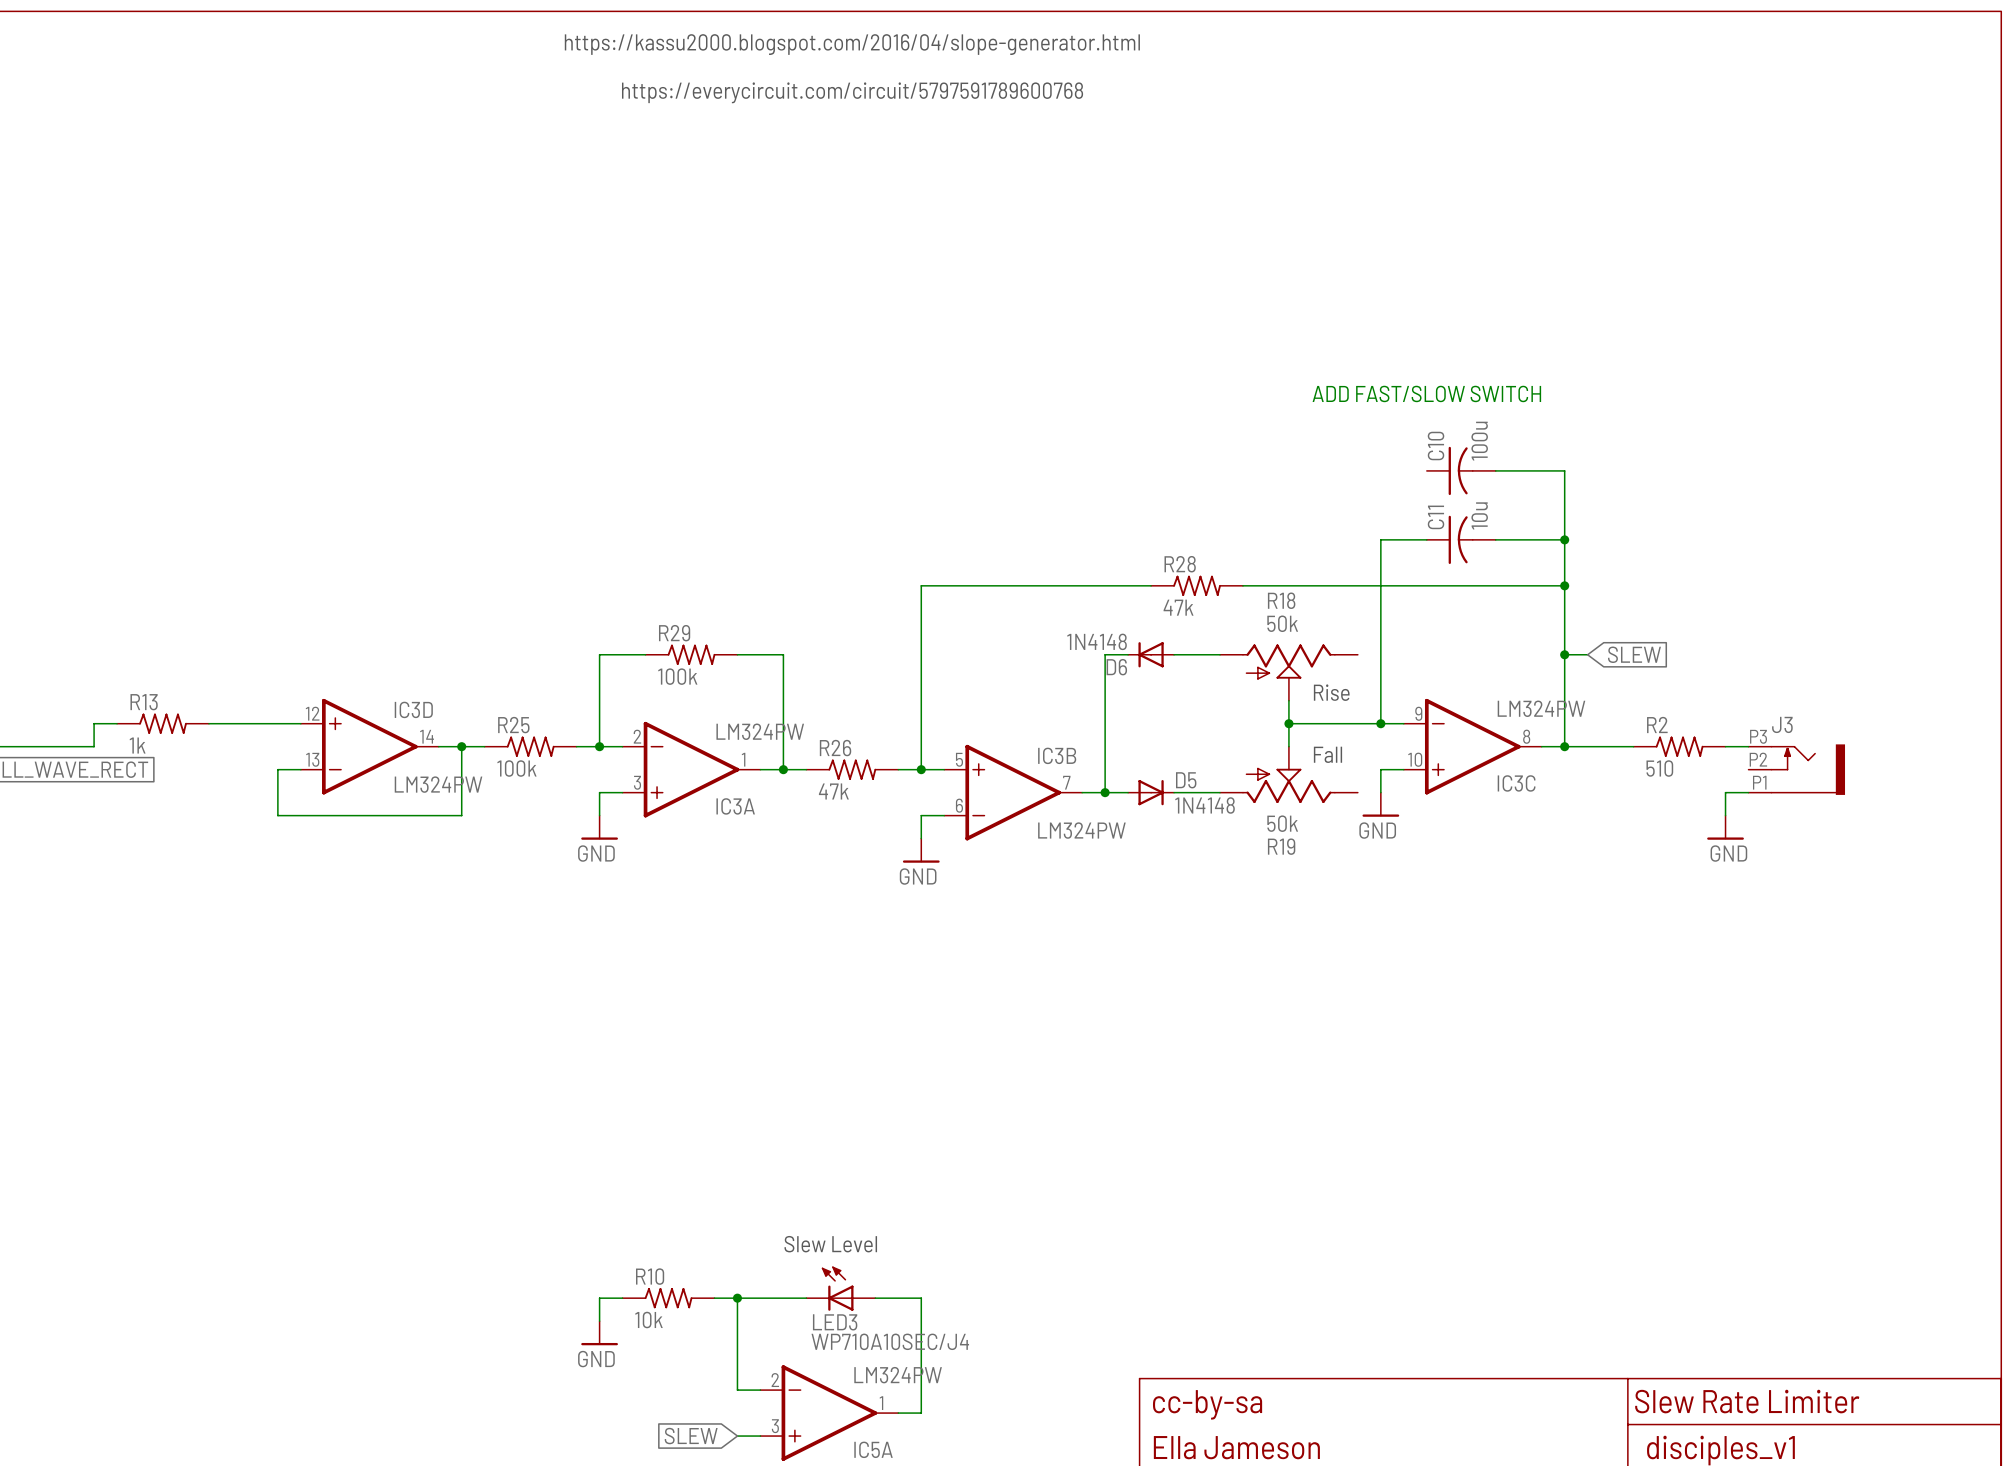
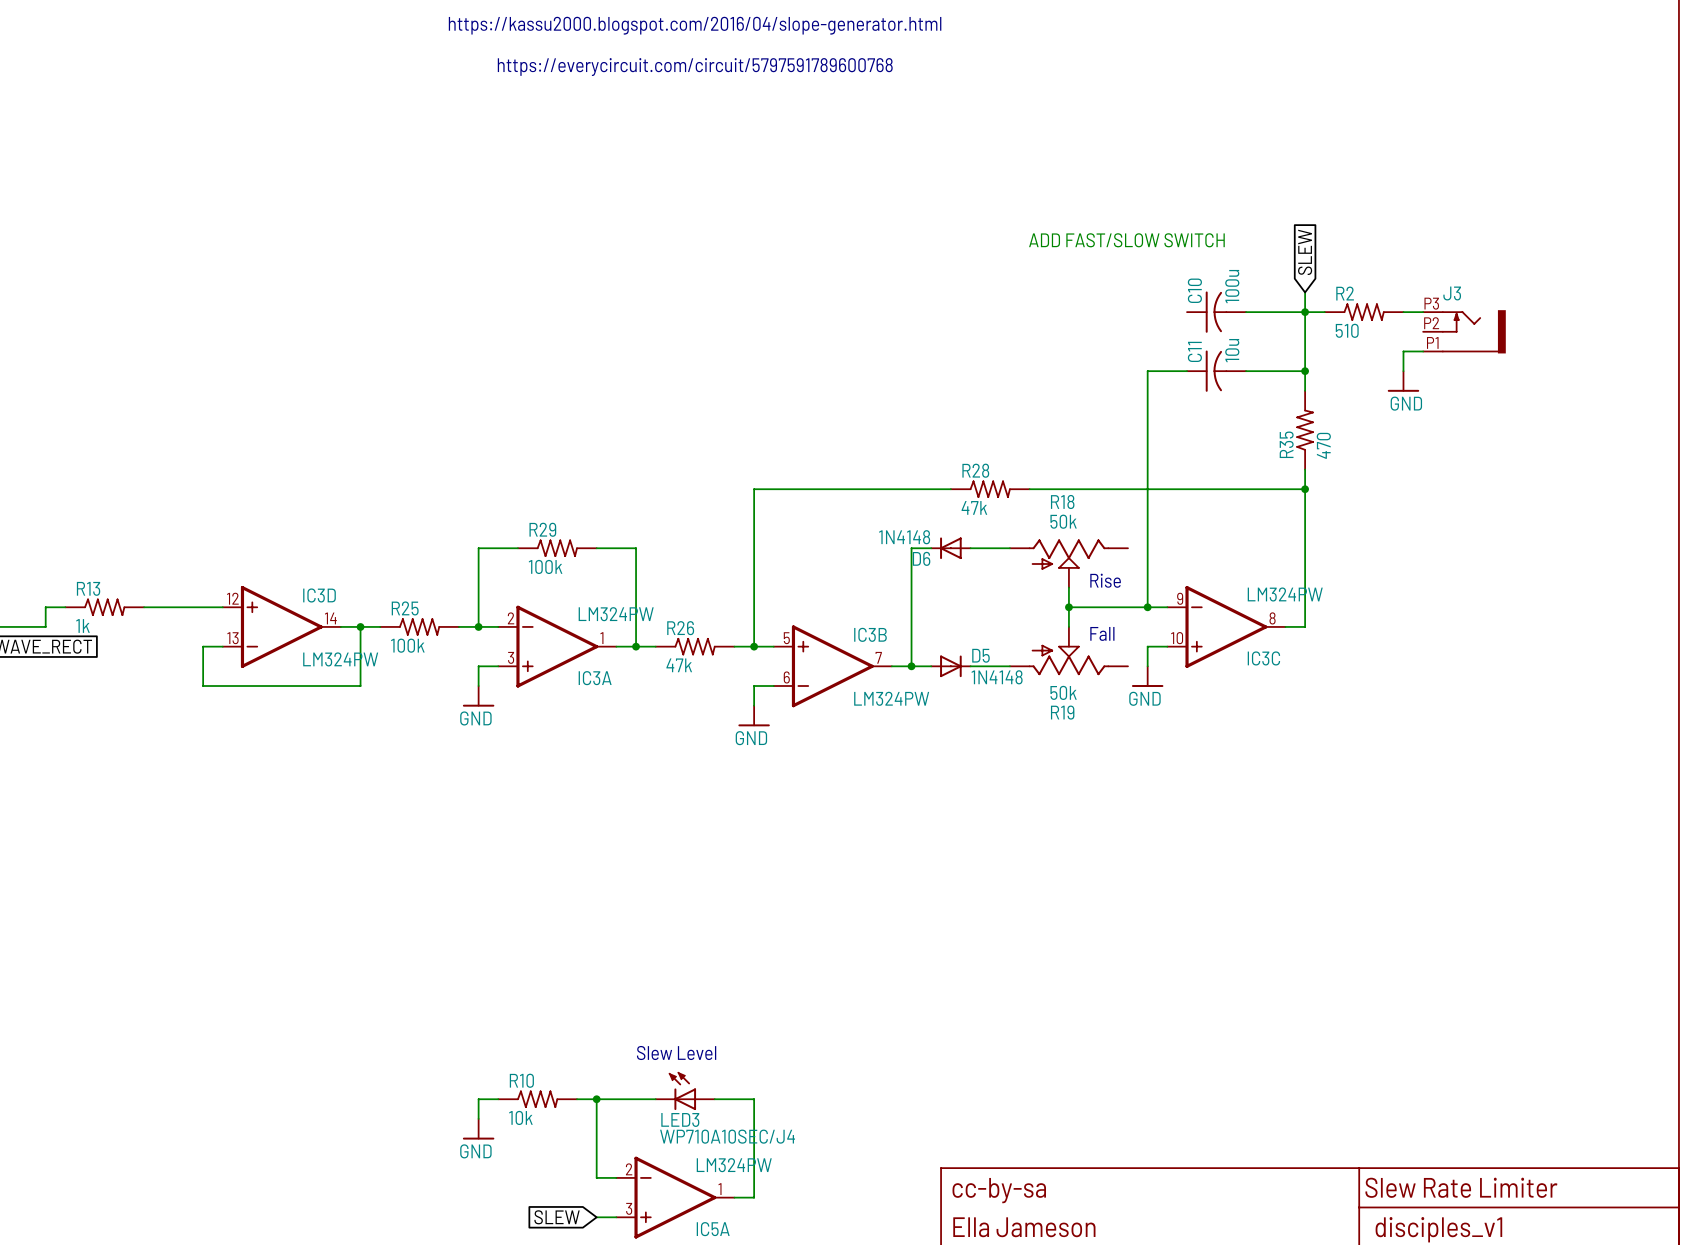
global label: none -> SLEW (1305, 252)
wire: none -> (1305, 292) (1305, 390)
wire: none -> (1246, 312) (1324, 312)
junction: none -> (1305, 312)
wire: none -> (1403, 312) (1423, 312)
text position: ADD FAST/SLOW SWITCH (1426, 393) -> ADD FAST/SLOW SWITCH (1126, 240)
wire: none -> (1423, 351) (1403, 351) (1403, 371)
junction: none -> (1305, 371)
power symbol: none -> GND (1403, 381)
C10 position: (1461, 470) -> (1216, 312)
wire: (1495, 470) (1564, 470) (1564, 562) -> none
R35: none -> 470 (1305, 430)
wire: (1380, 539) (1426, 539) -> (1147, 449) (1147, 371) (1187, 371)
C11 position: (1461, 539) -> (1216, 371)
wire: (1495, 539) (1564, 539) -> (1246, 371) (1305, 371)
junction: (1564, 539) -> none
wire: (1564, 654) (1587, 654) -> none
junction: (1564, 654) -> none
global label: SLEW (1634, 654) -> none
wire: (1564, 746) (1633, 746) -> none
junction: (1564, 746) -> none
R2 position: (1679, 746) -> (1364, 312)
wire: (1725, 746) (1748, 746) -> none
J3 position: (1796, 769) -> (1464, 331)
wire: (1748, 792) (1725, 792) (1725, 815) -> none
power symbol: GND (1725, 827) -> none

